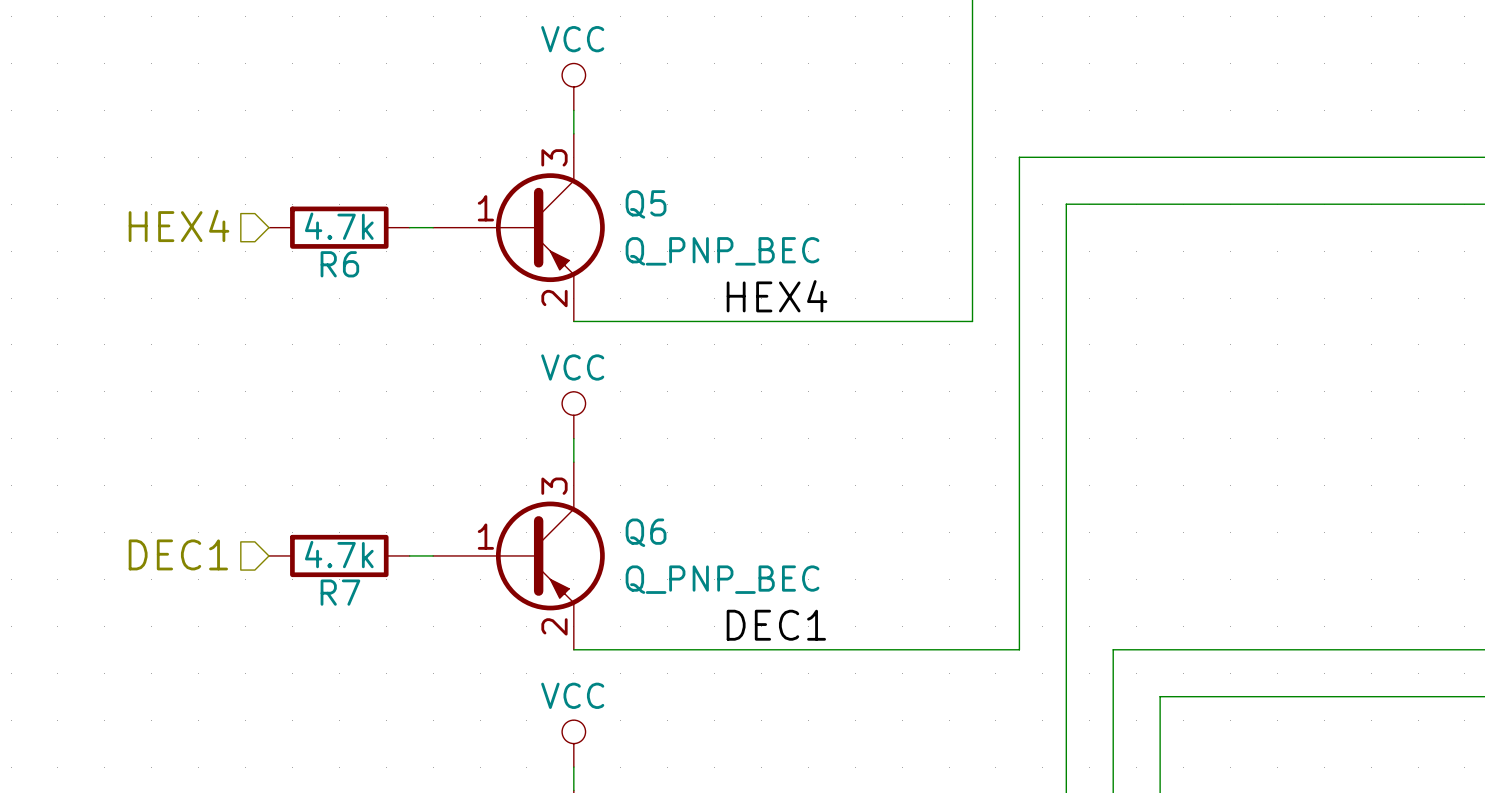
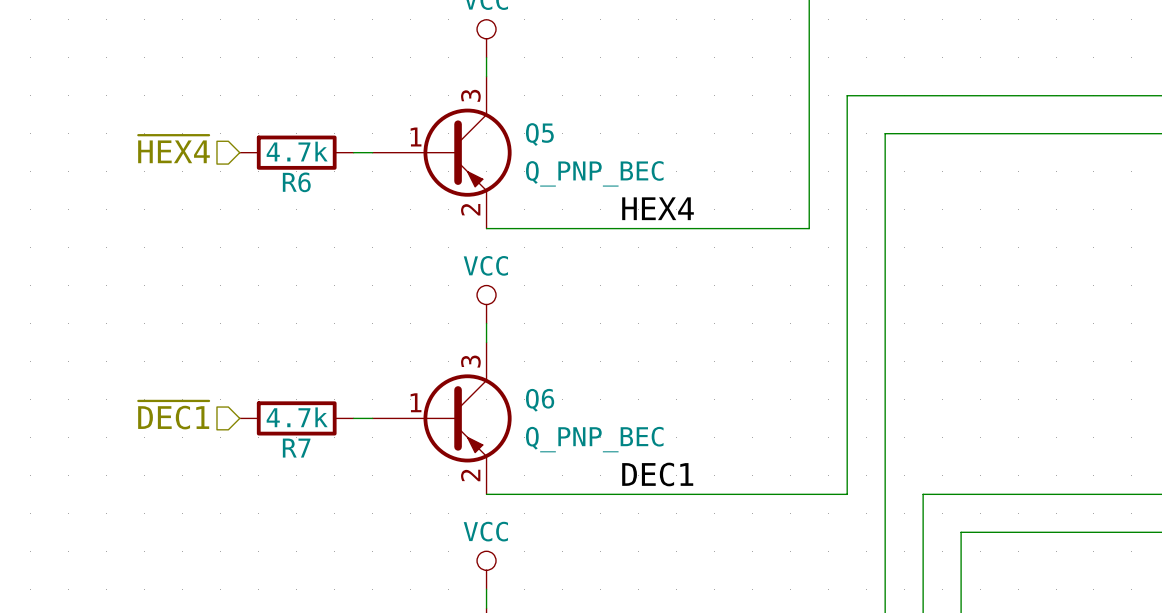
hierarchical label: HEX4 (179, 225) -> ~{HEX4} (173, 149)
hierarchical label: DEC1 (178, 554) -> ~{DEC1} (173, 415)

